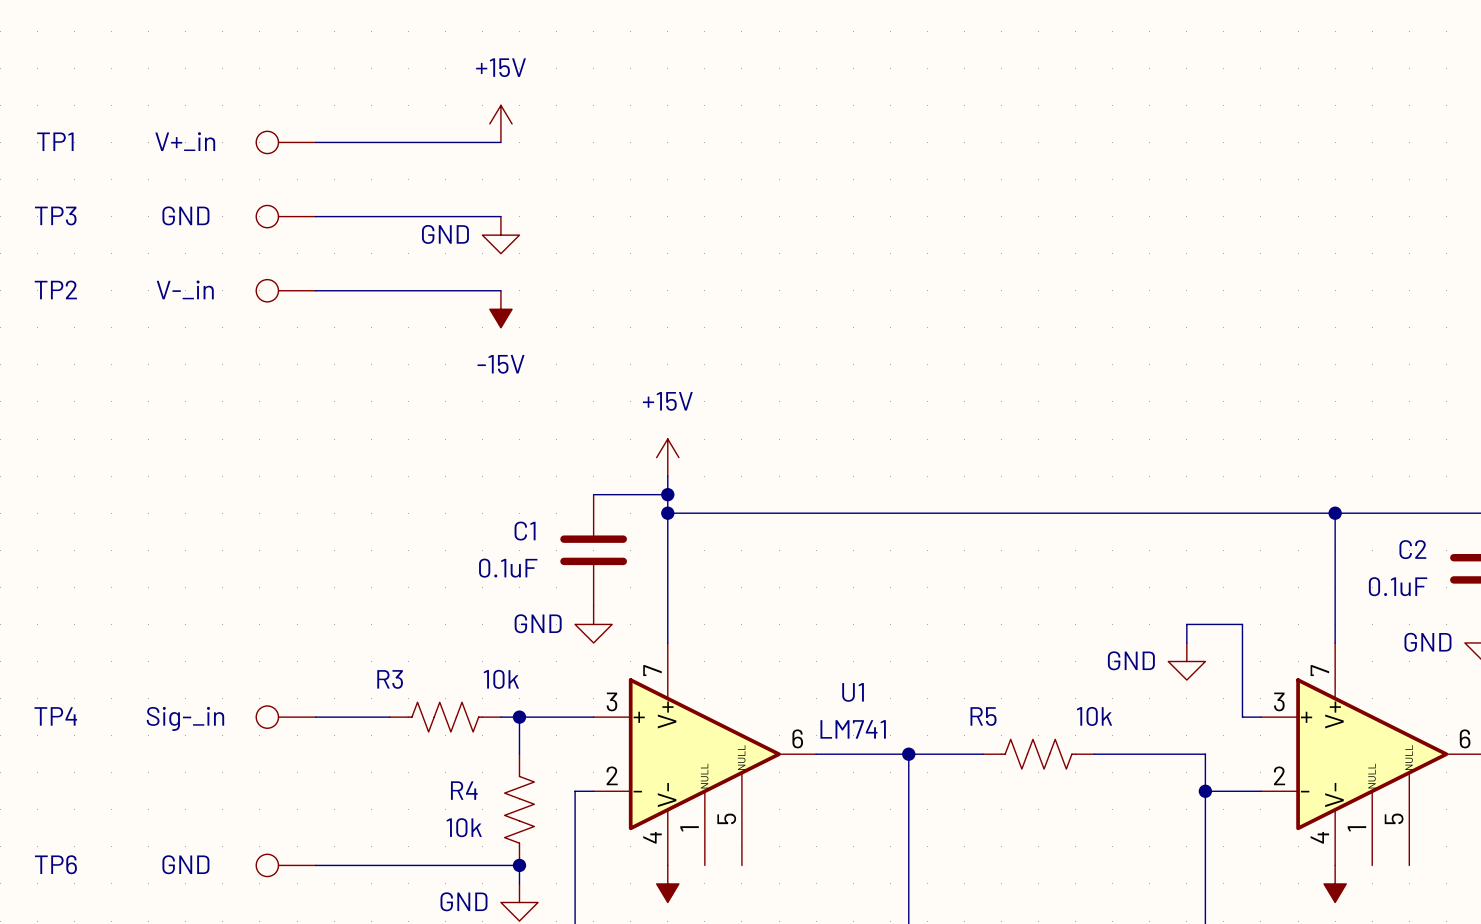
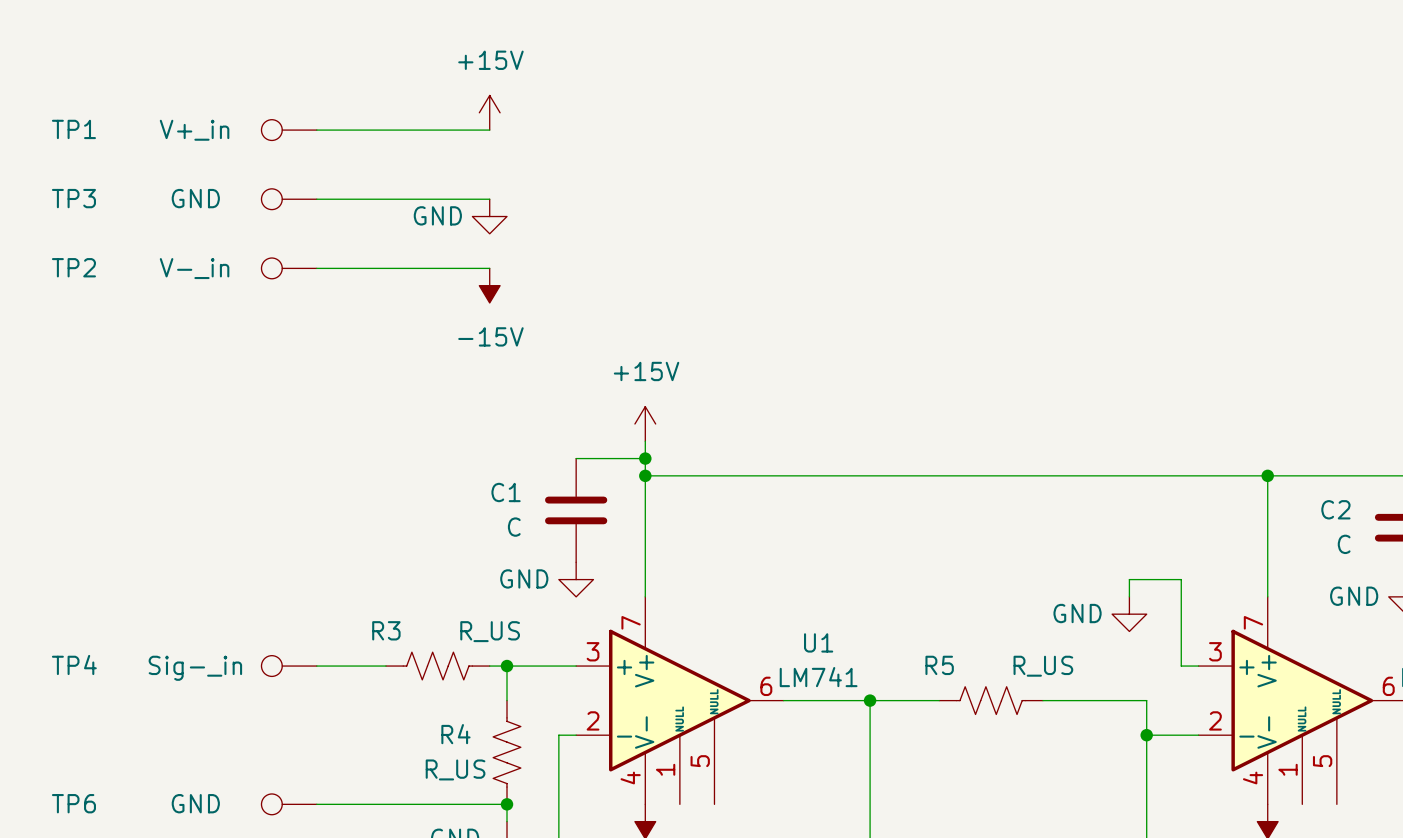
C1 value: 0.1uF (508, 568) -> C (514, 527)
C2 value: 0.1uF (1398, 586) -> C (1344, 544)
R3 value: 10k (501, 679) -> R_US (490, 631)
R5 value: 10k (1094, 716) -> R_US (1043, 666)
R4 value: 10k (464, 827) -> R_US (455, 769)

